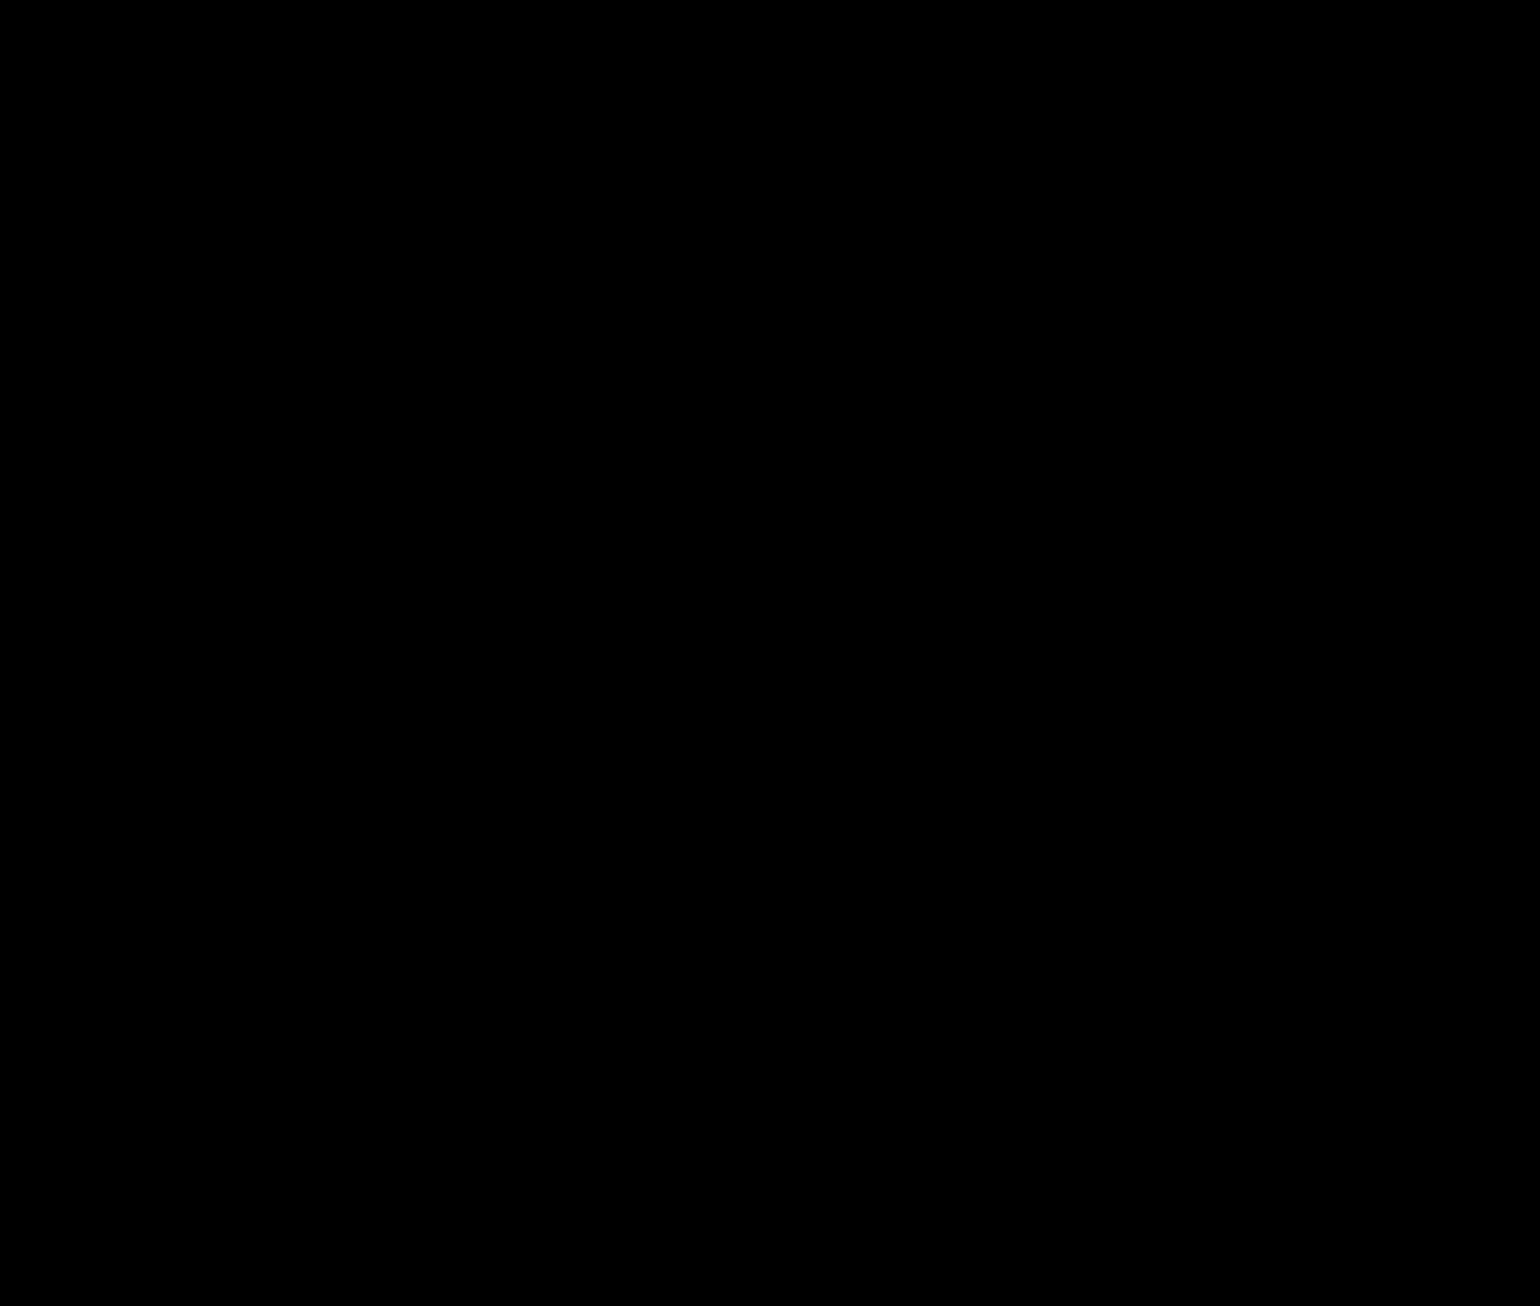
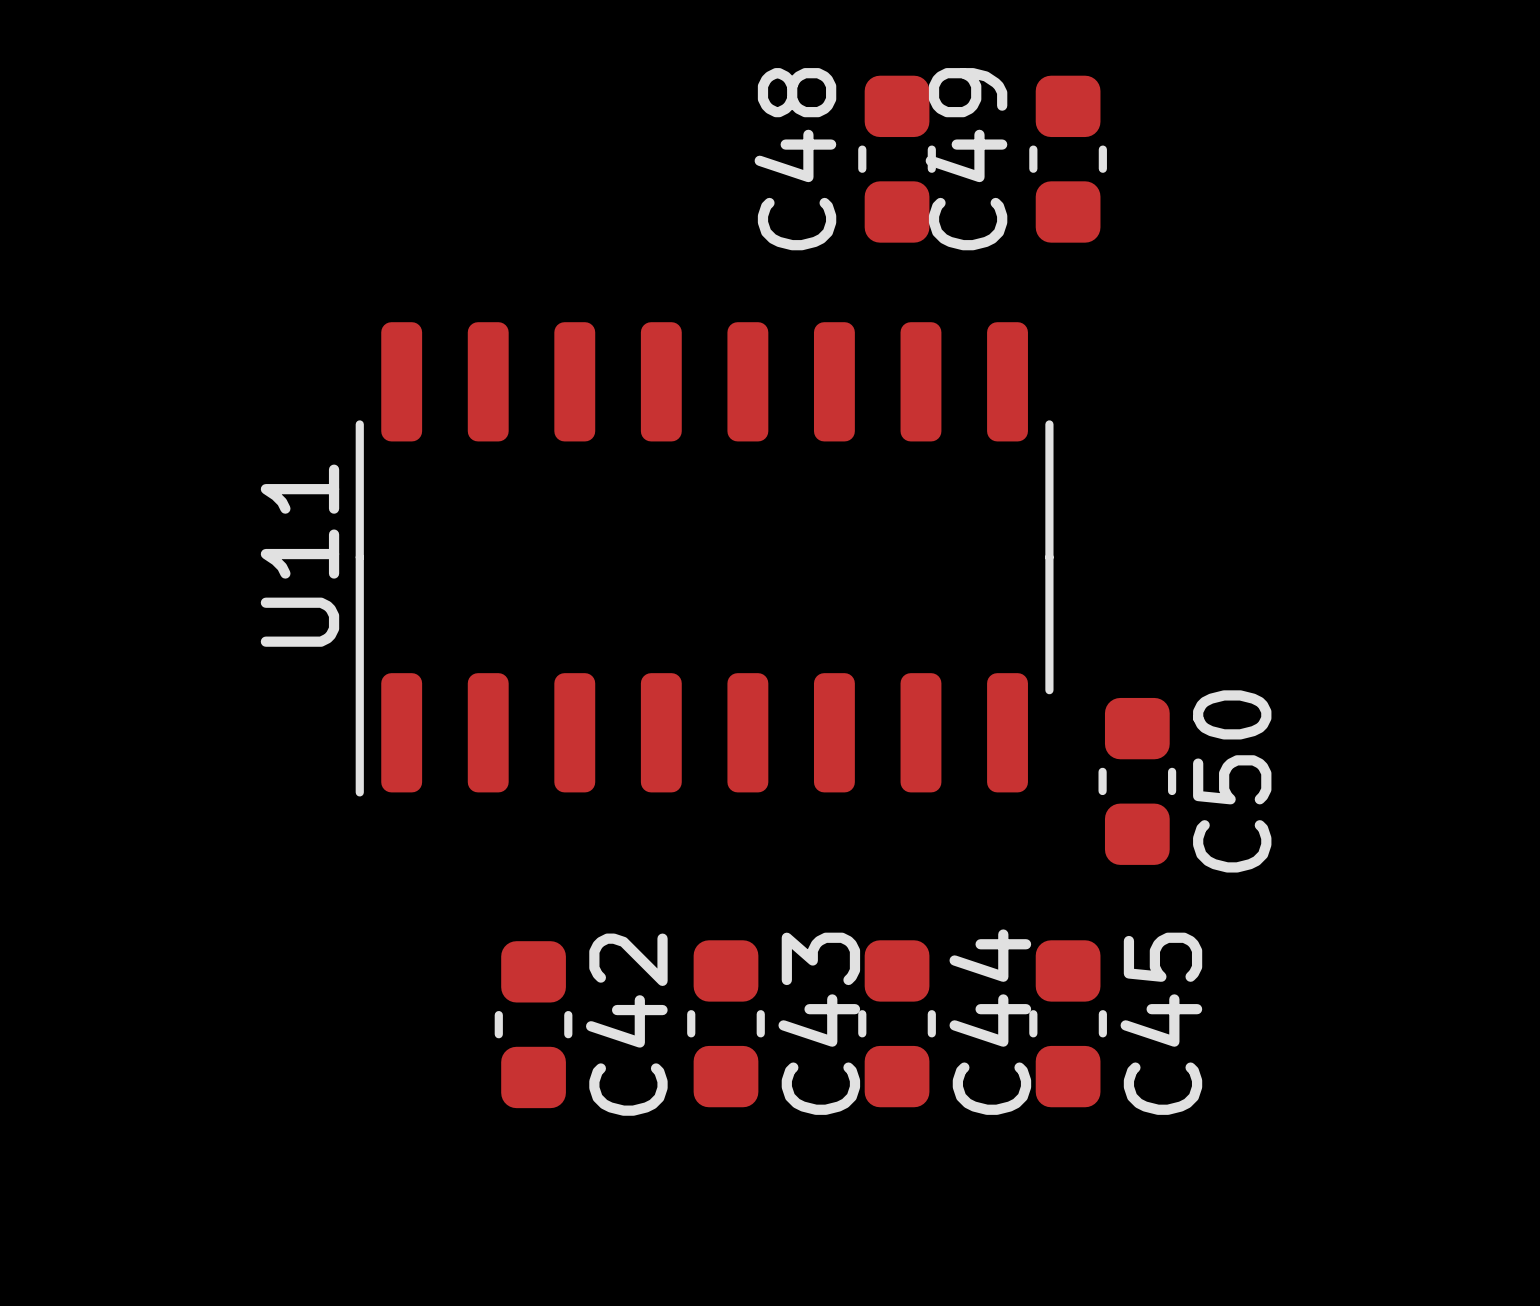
C48: none -> (897, 159)
C49: none -> (1068, 159)
U11: none -> (704, 559)
C50: none -> (1137, 781)
C43: none -> (726, 1023)
C44: none -> (897, 1023)
C45: none -> (1068, 1023)
C42: none -> (533, 1024)

